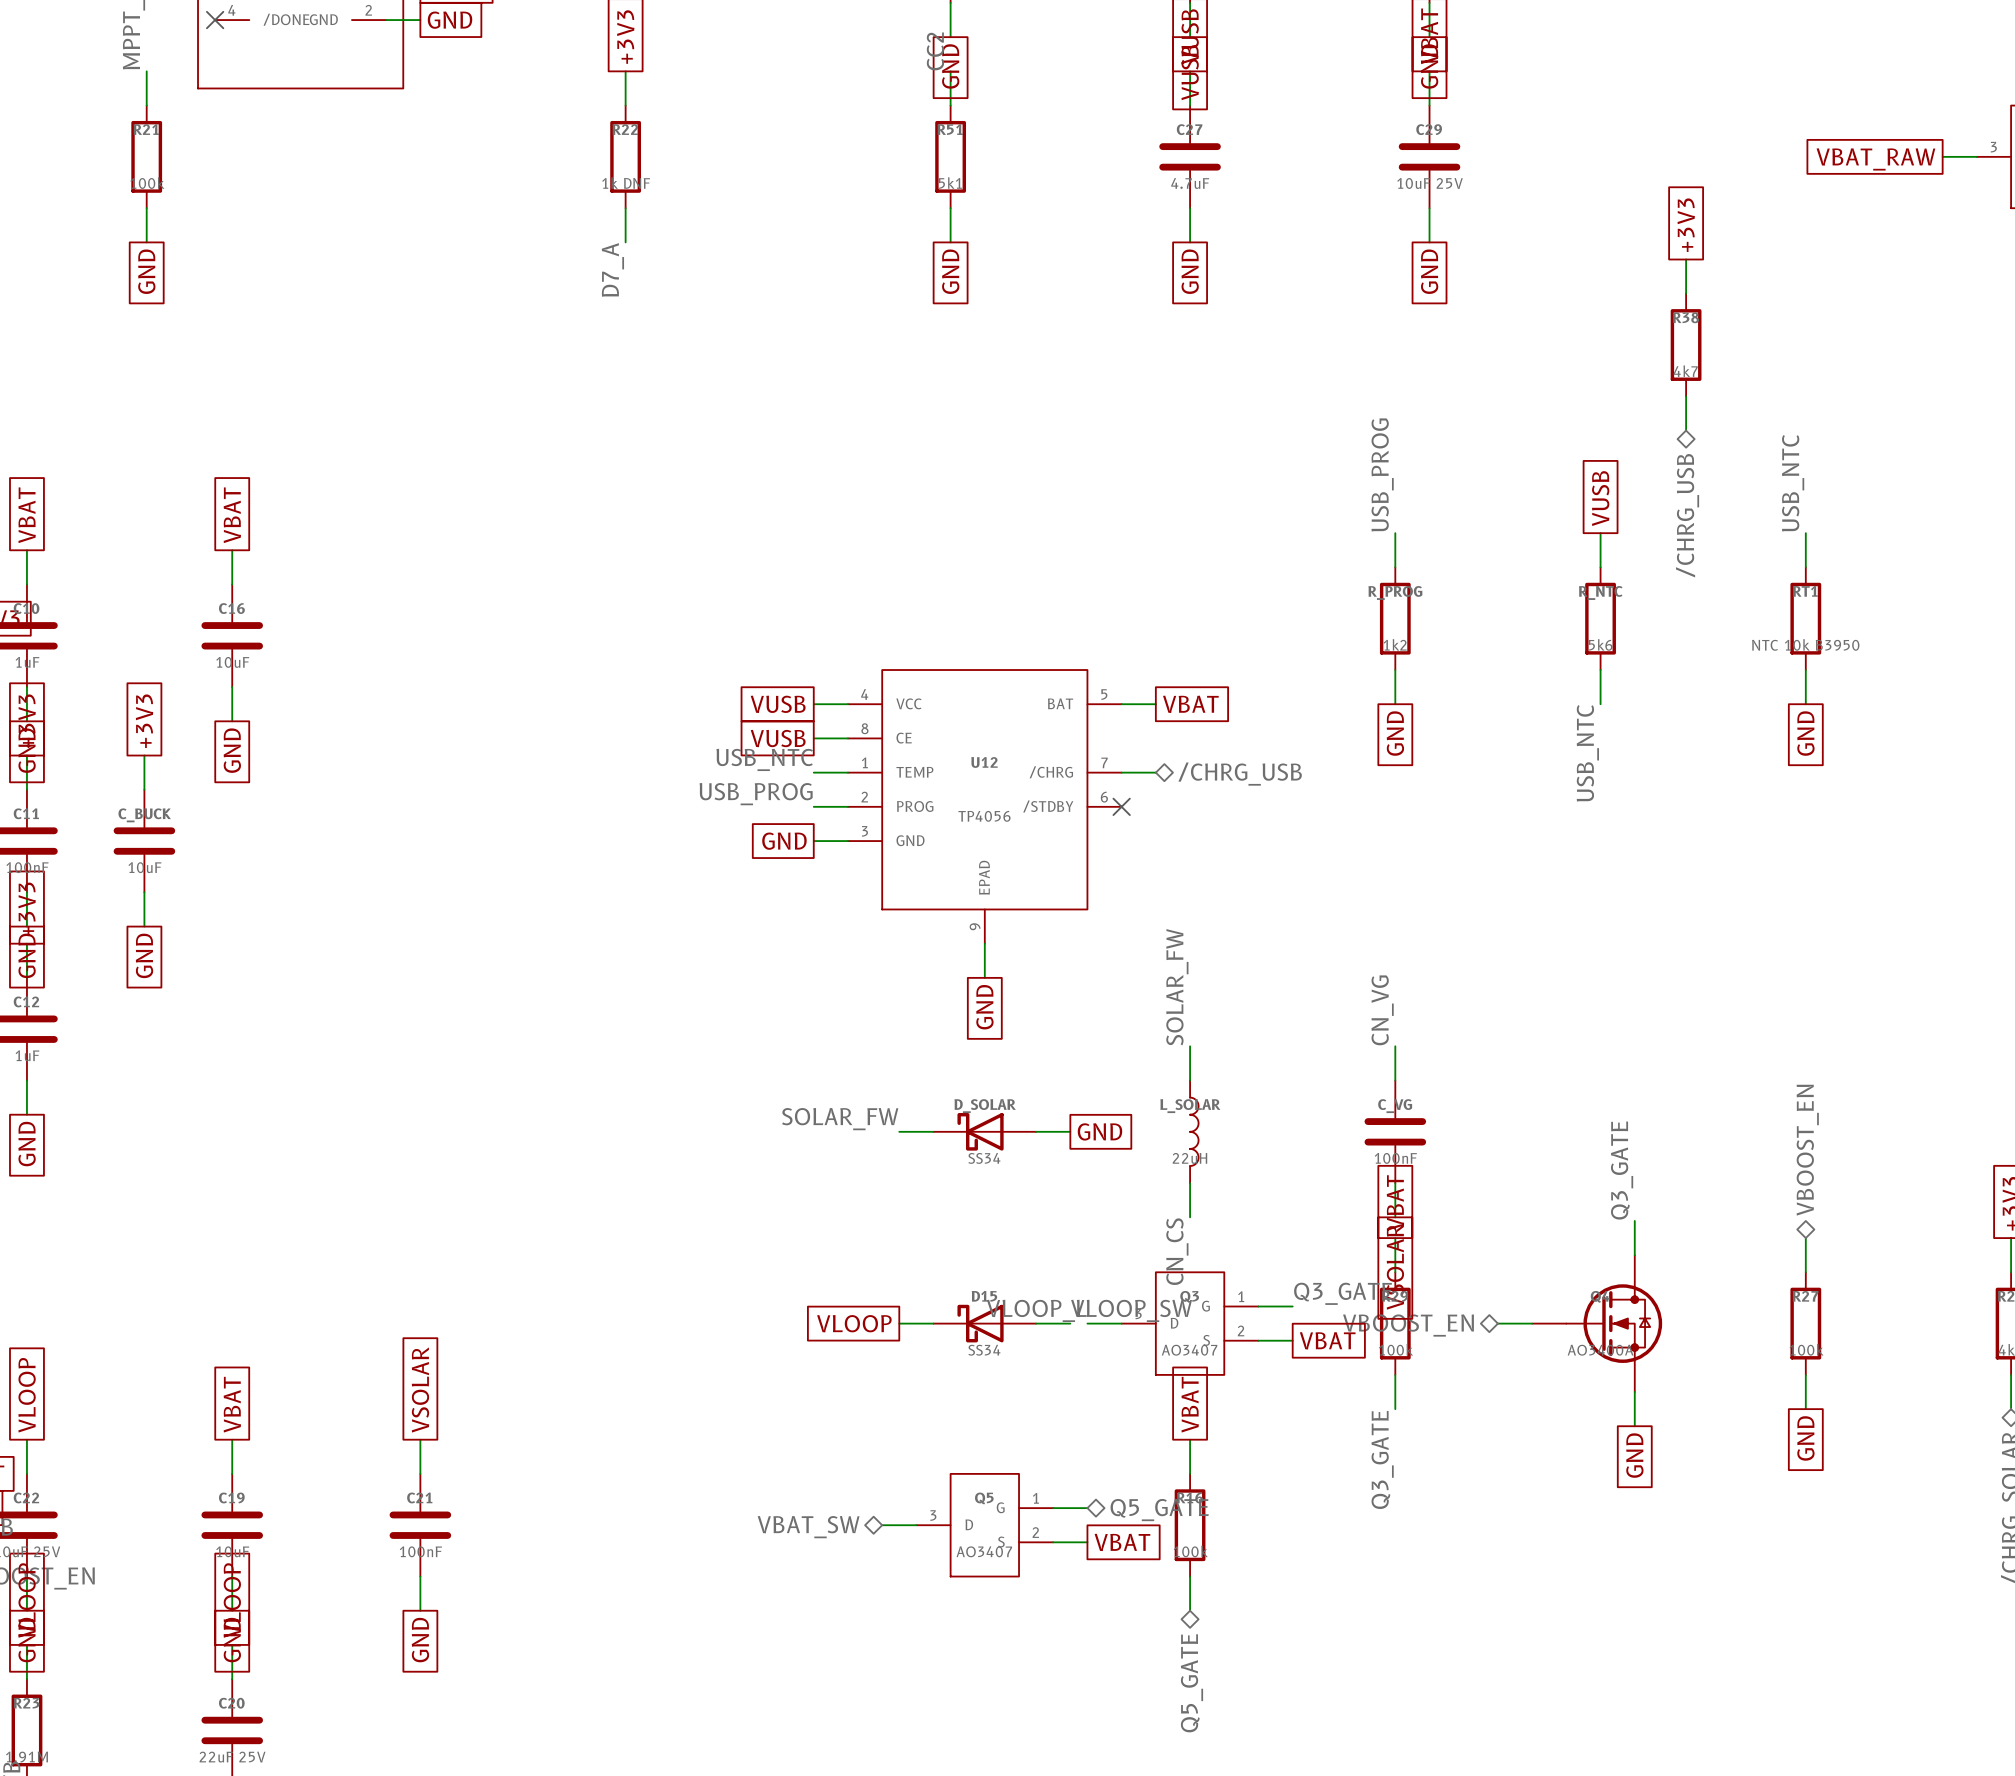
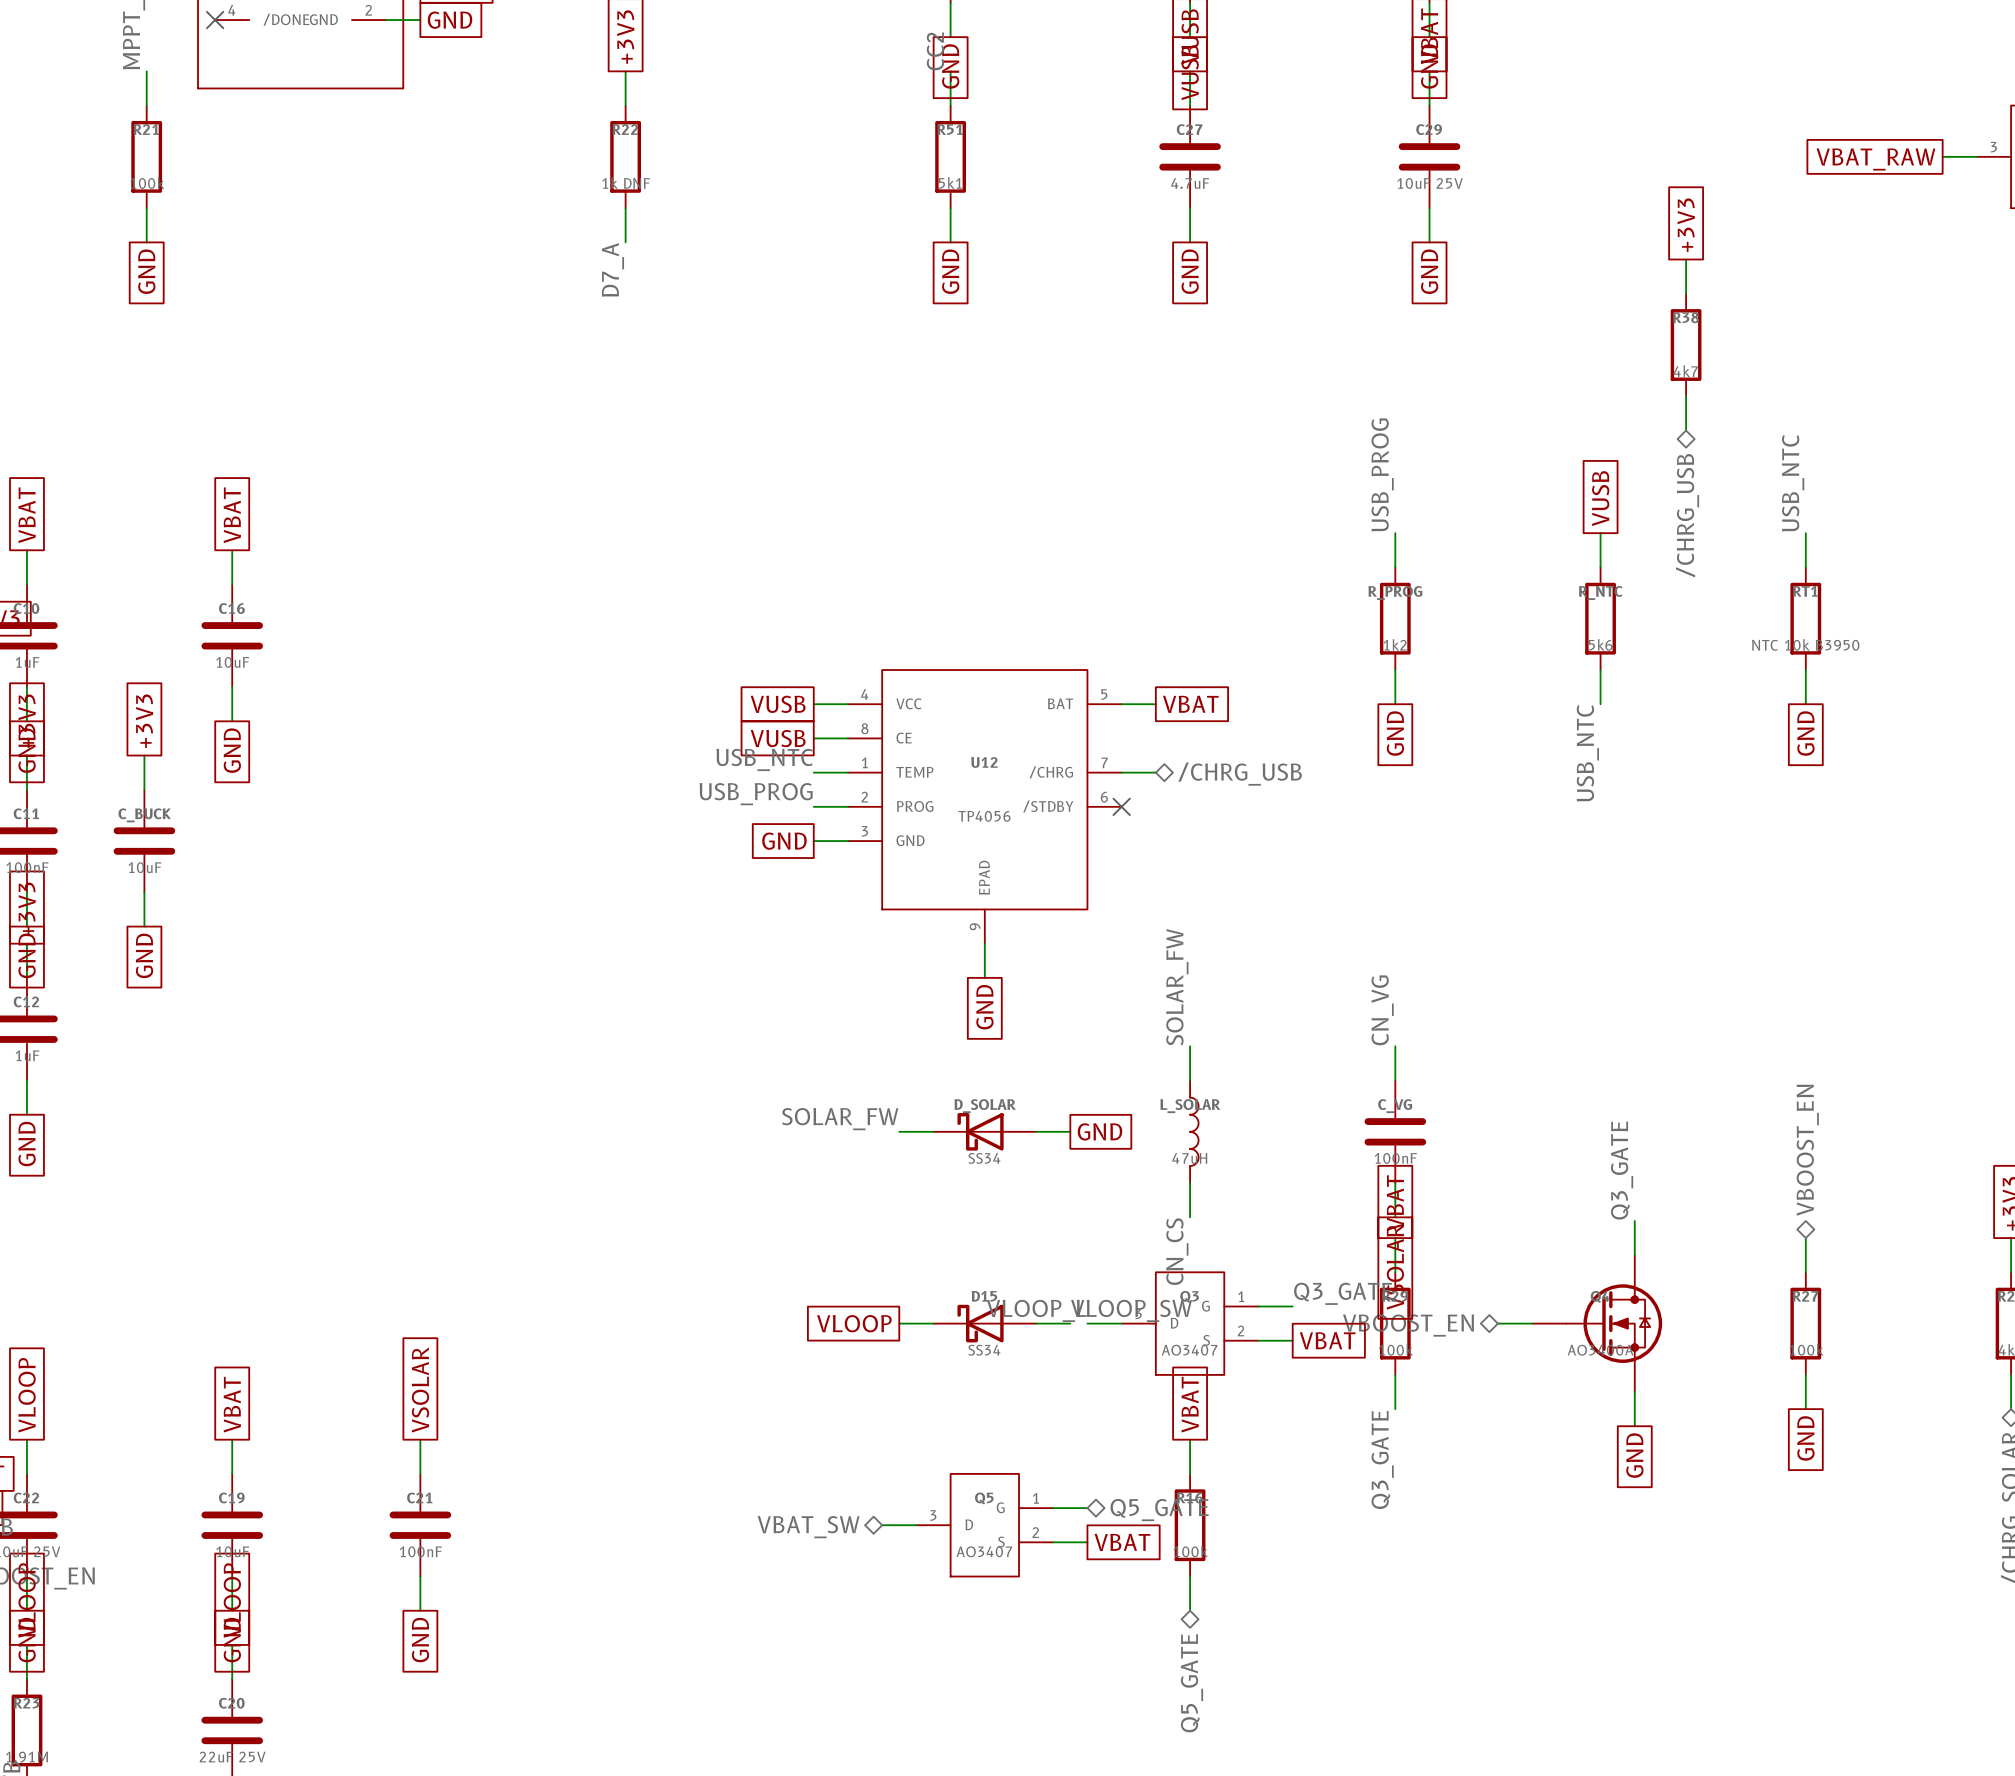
L_SOLAR value: 22uH (1189, 1158) -> 47uH (1189, 1158)

